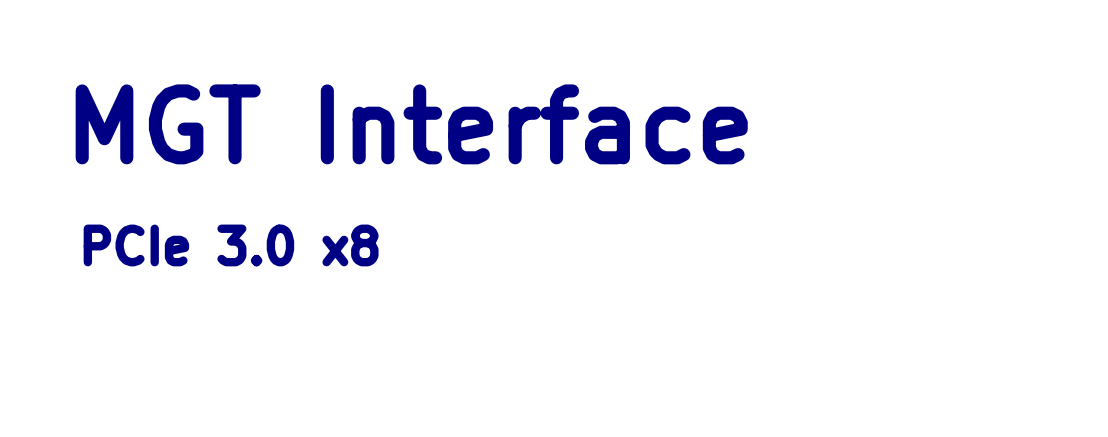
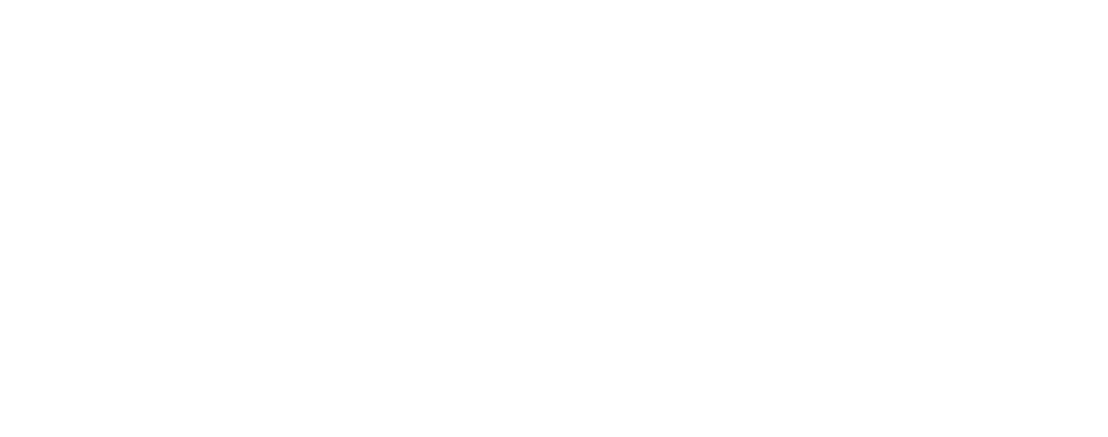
text: MGT Interface (411, 124) -> none
text: PCIe 3.0 x8 (231, 245) -> none

